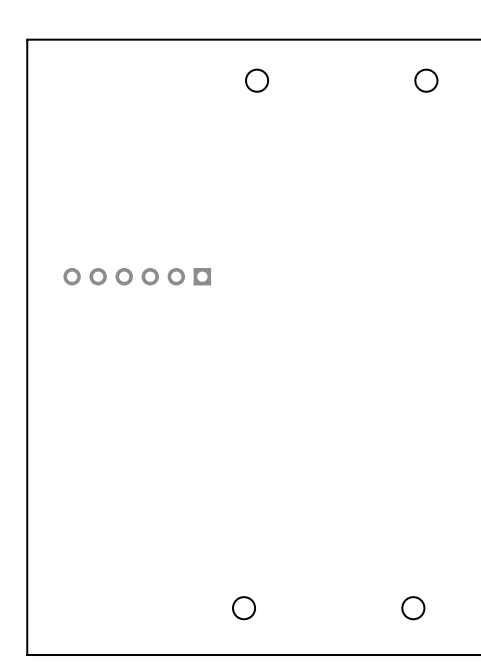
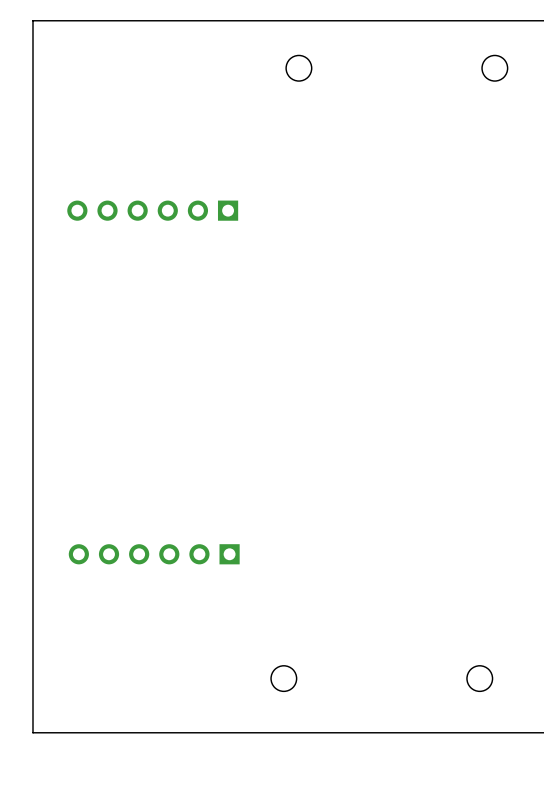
part position: (137, 276) -> (152, 210)
part: none -> (154, 554)

